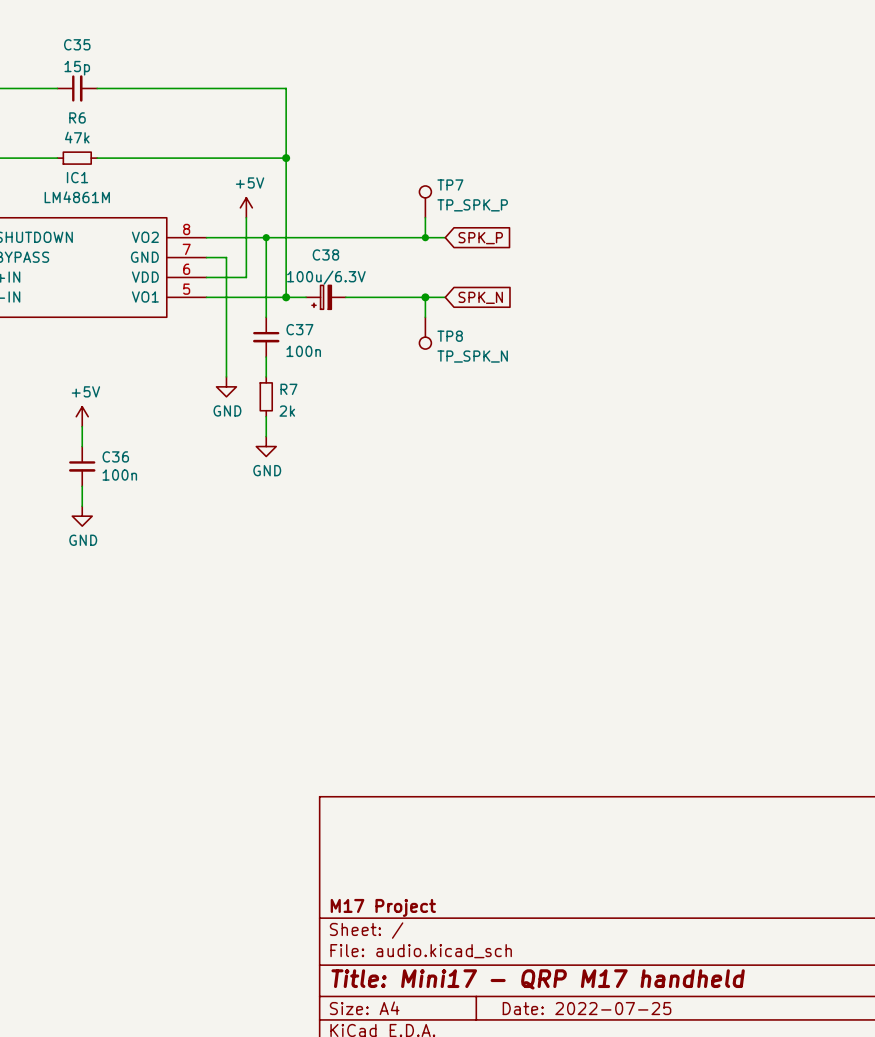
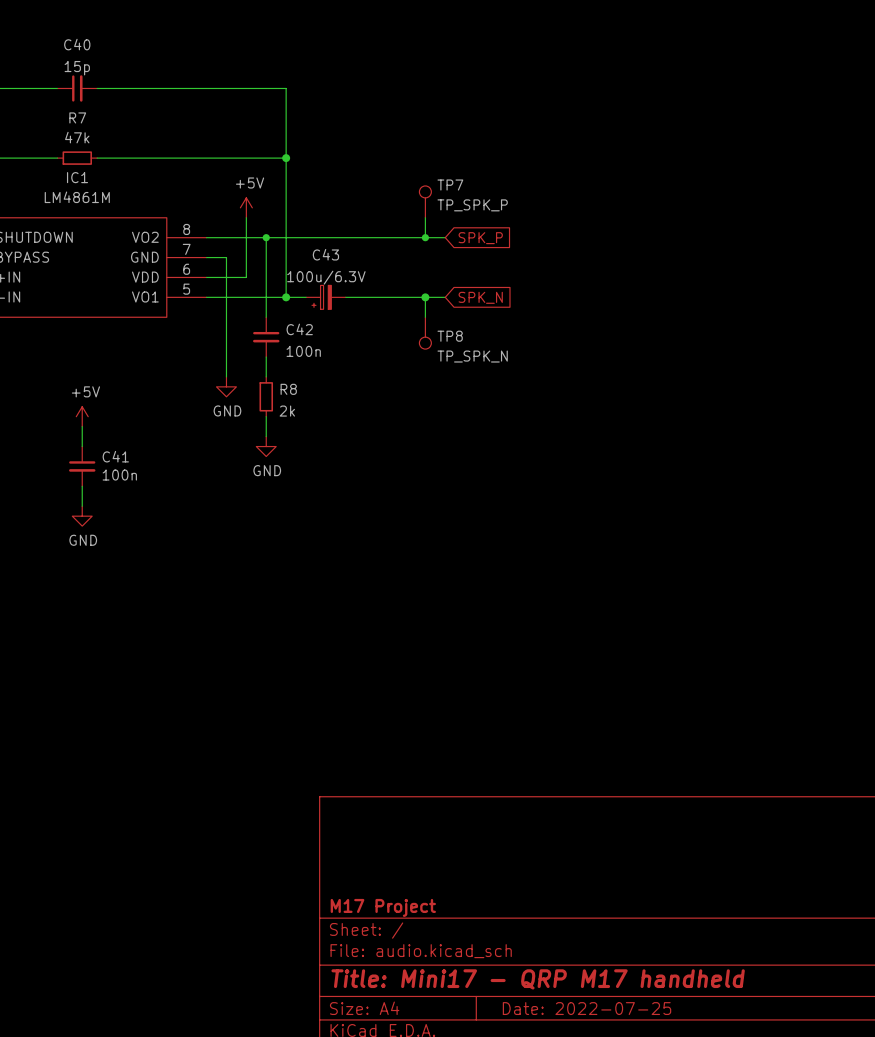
C35 name: C35 (77, 44) -> C40 (77, 44)
R6 name: R6 (77, 117) -> R7 (77, 117)
C38 name: C38 (325, 254) -> C43 (325, 254)
C37 name: C37 (299, 329) -> C42 (299, 329)
R7 name: R7 (288, 389) -> R8 (288, 389)
C36 name: C36 (115, 456) -> C41 (115, 456)

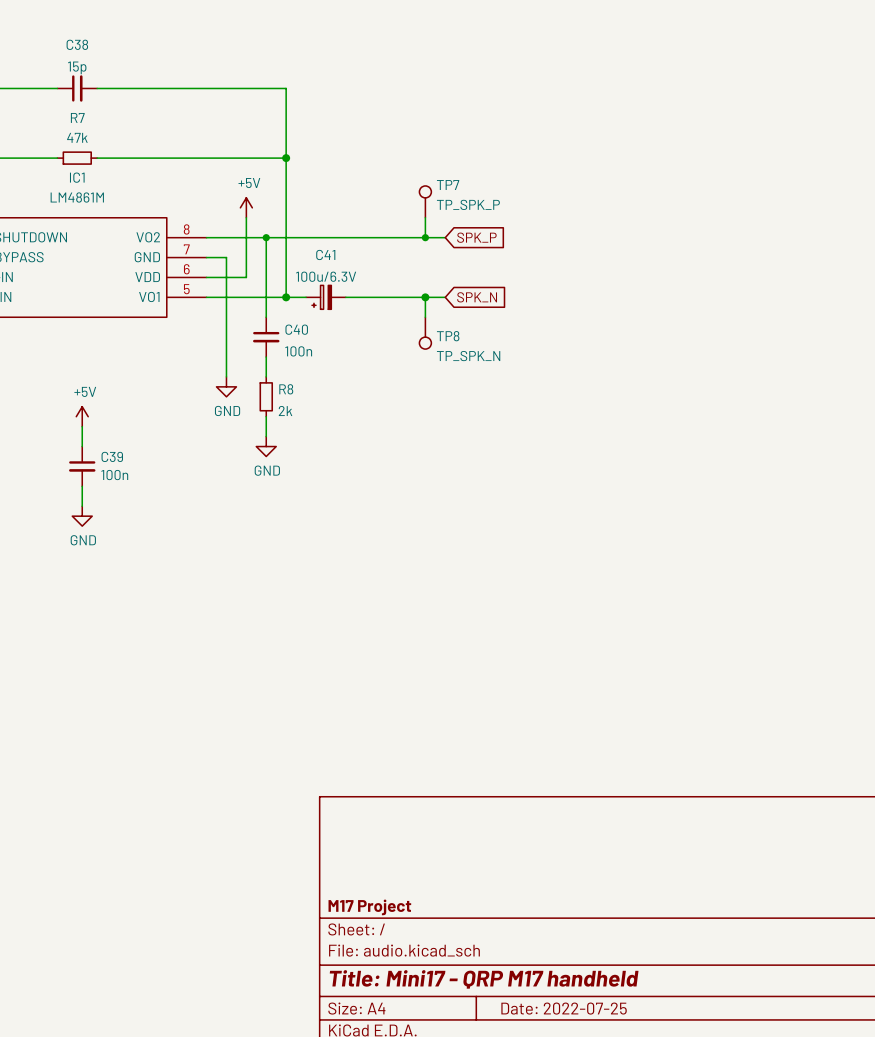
C40 name: C40 (77, 44) -> C38 (77, 44)
C43 name: C43 (325, 254) -> C41 (325, 254)
C42 name: C42 (299, 329) -> C40 (296, 329)
C41 name: C41 (115, 456) -> C39 (112, 456)

